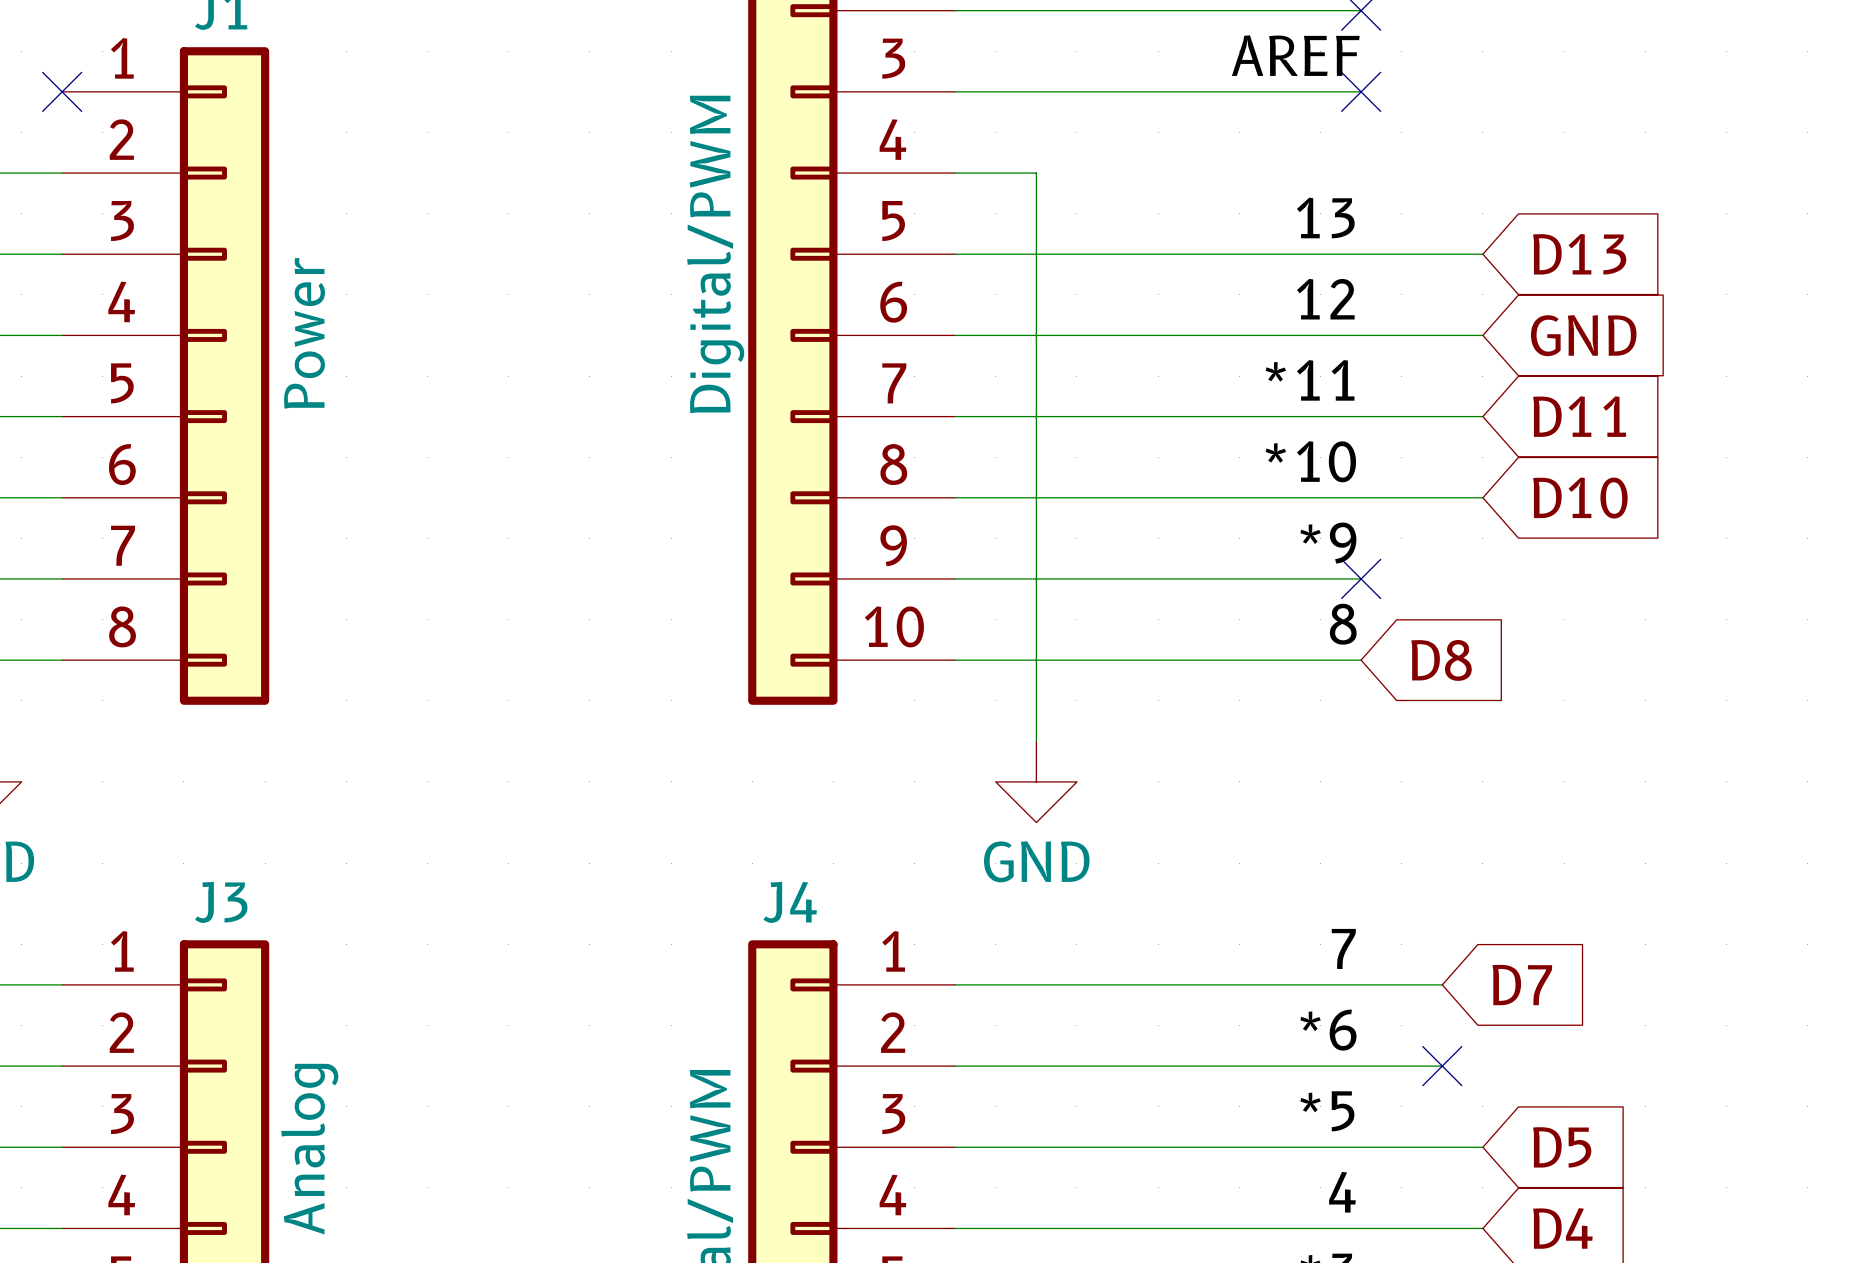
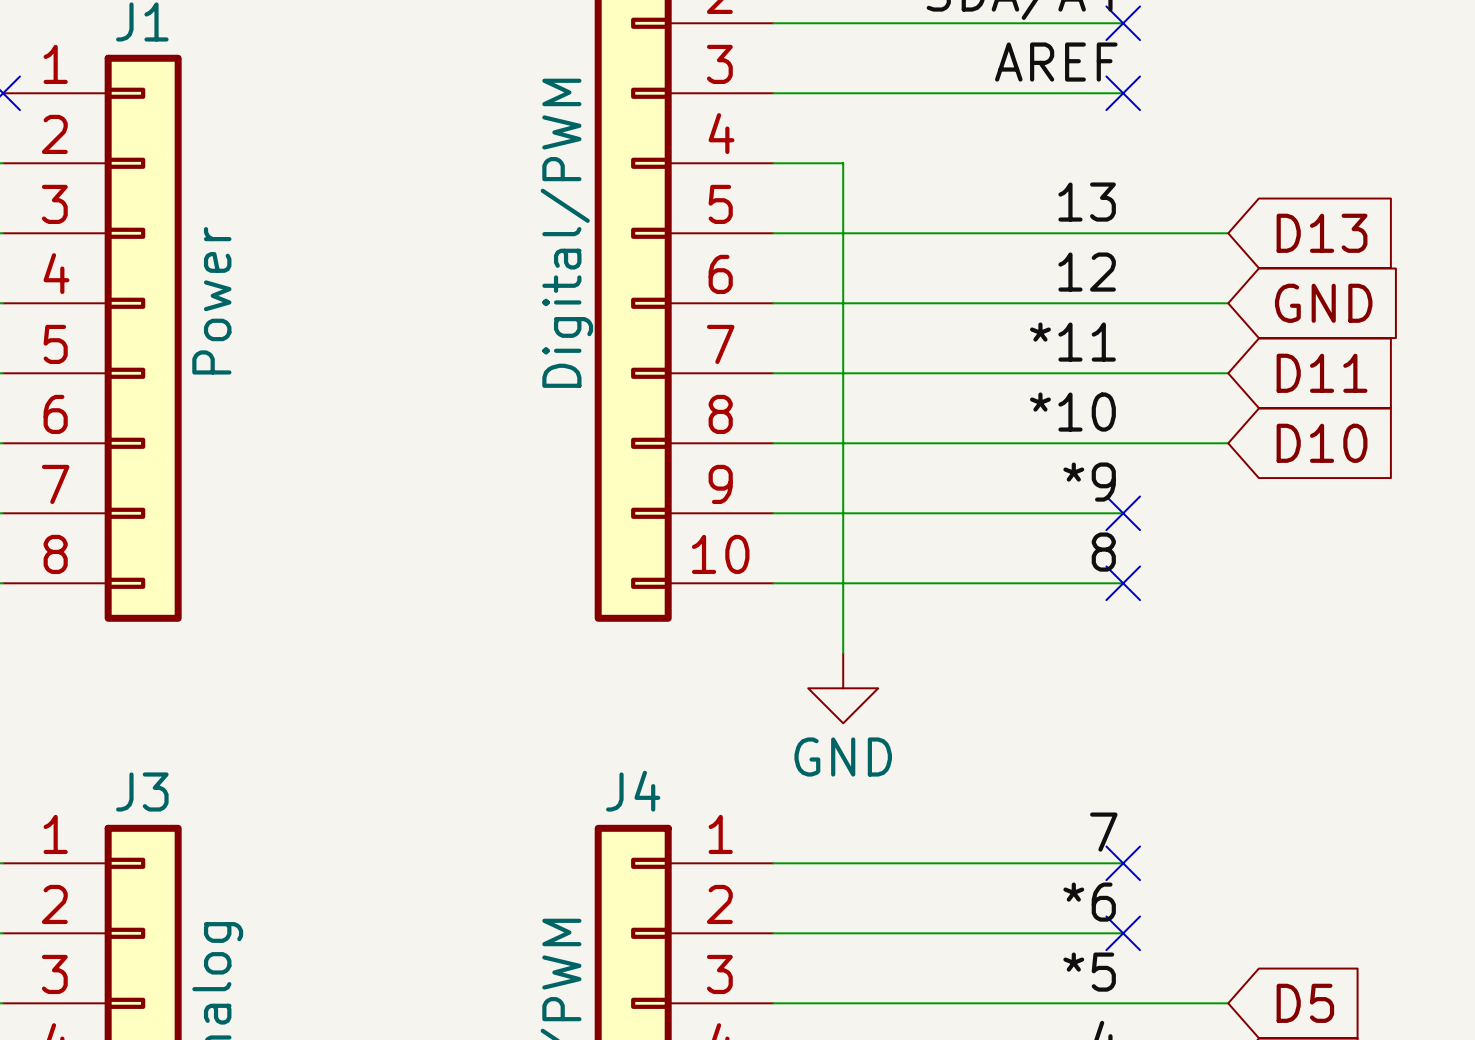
no-connect mark: none -> (1123, 583)
global label: D8 (1441, 660) -> none
wire: (1361, 984) (1442, 984) -> none
no-connect mark: none -> (1123, 863)
global label: D7 (1522, 985) -> none
wire: (1361, 1066) (1442, 1066) -> none
no-connect mark: none -> (1123, 933)
no-connect mark: (1442, 1066) -> none

